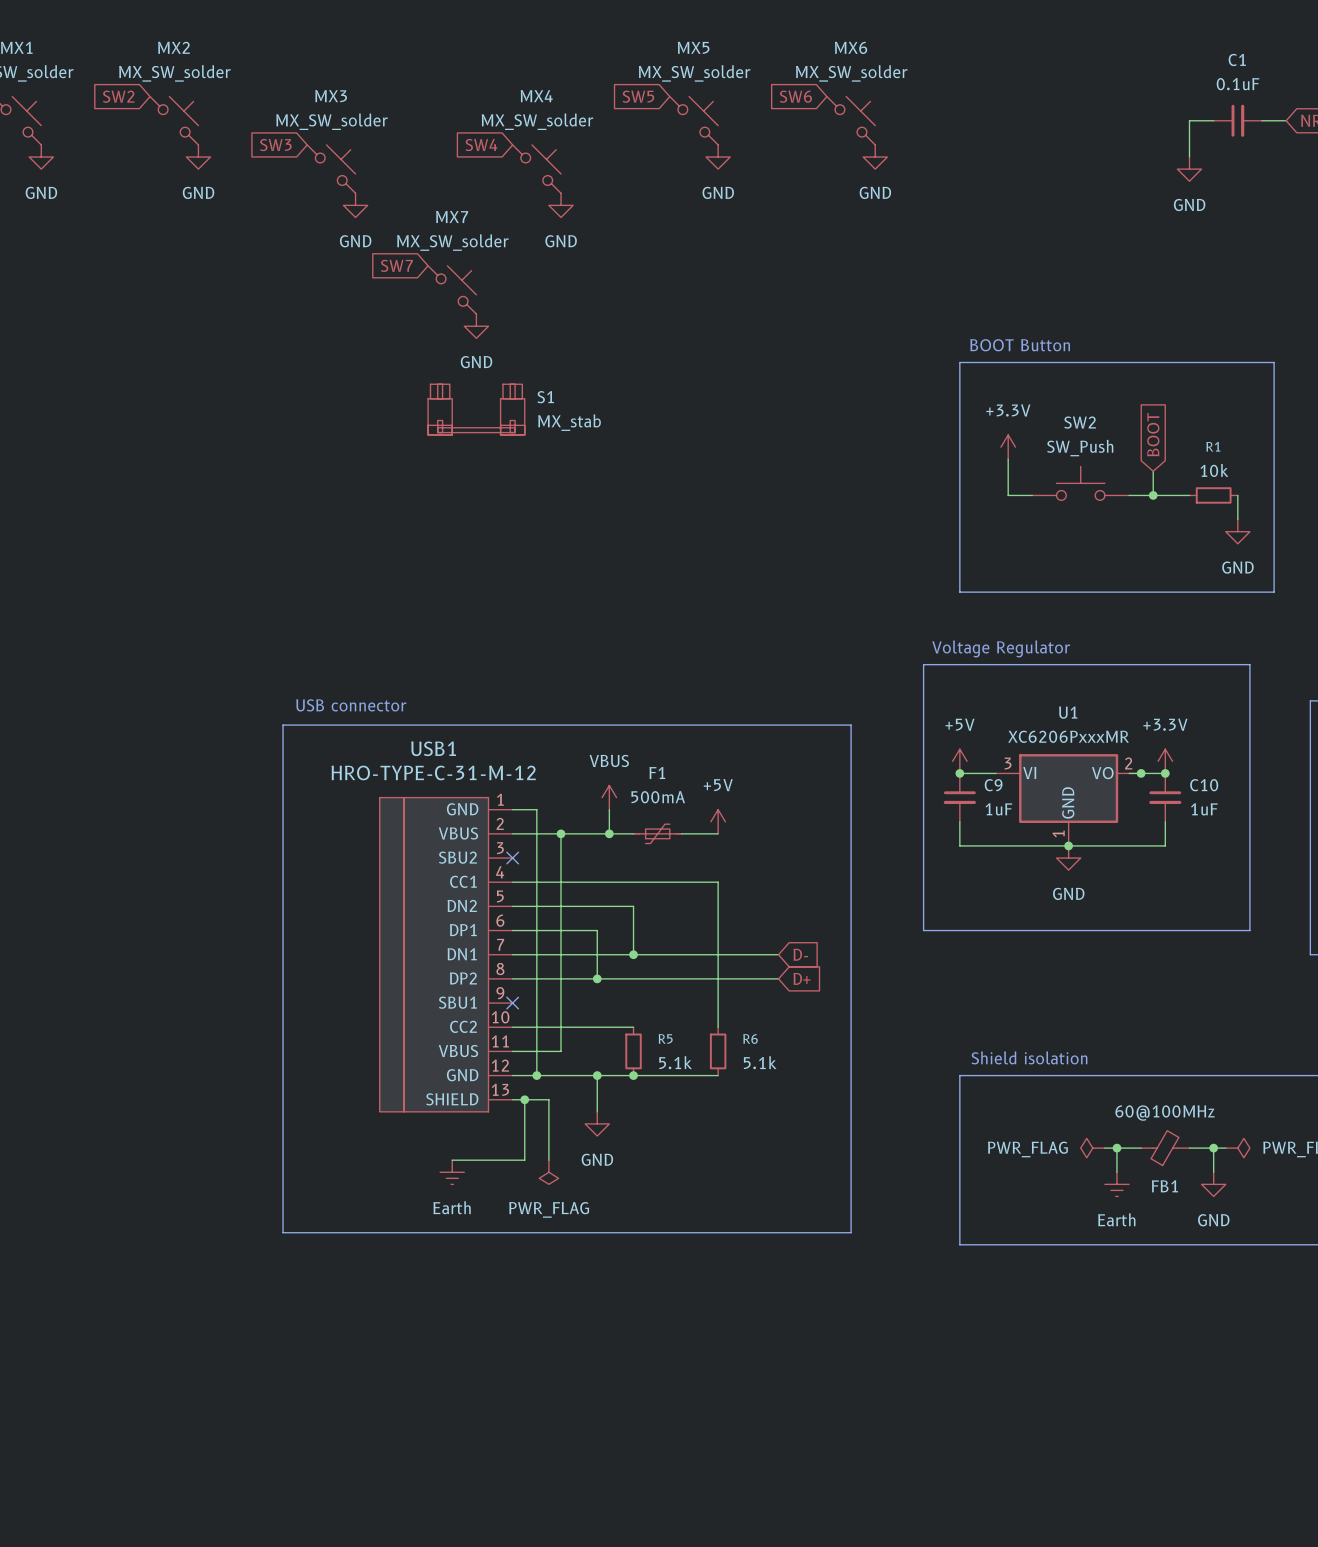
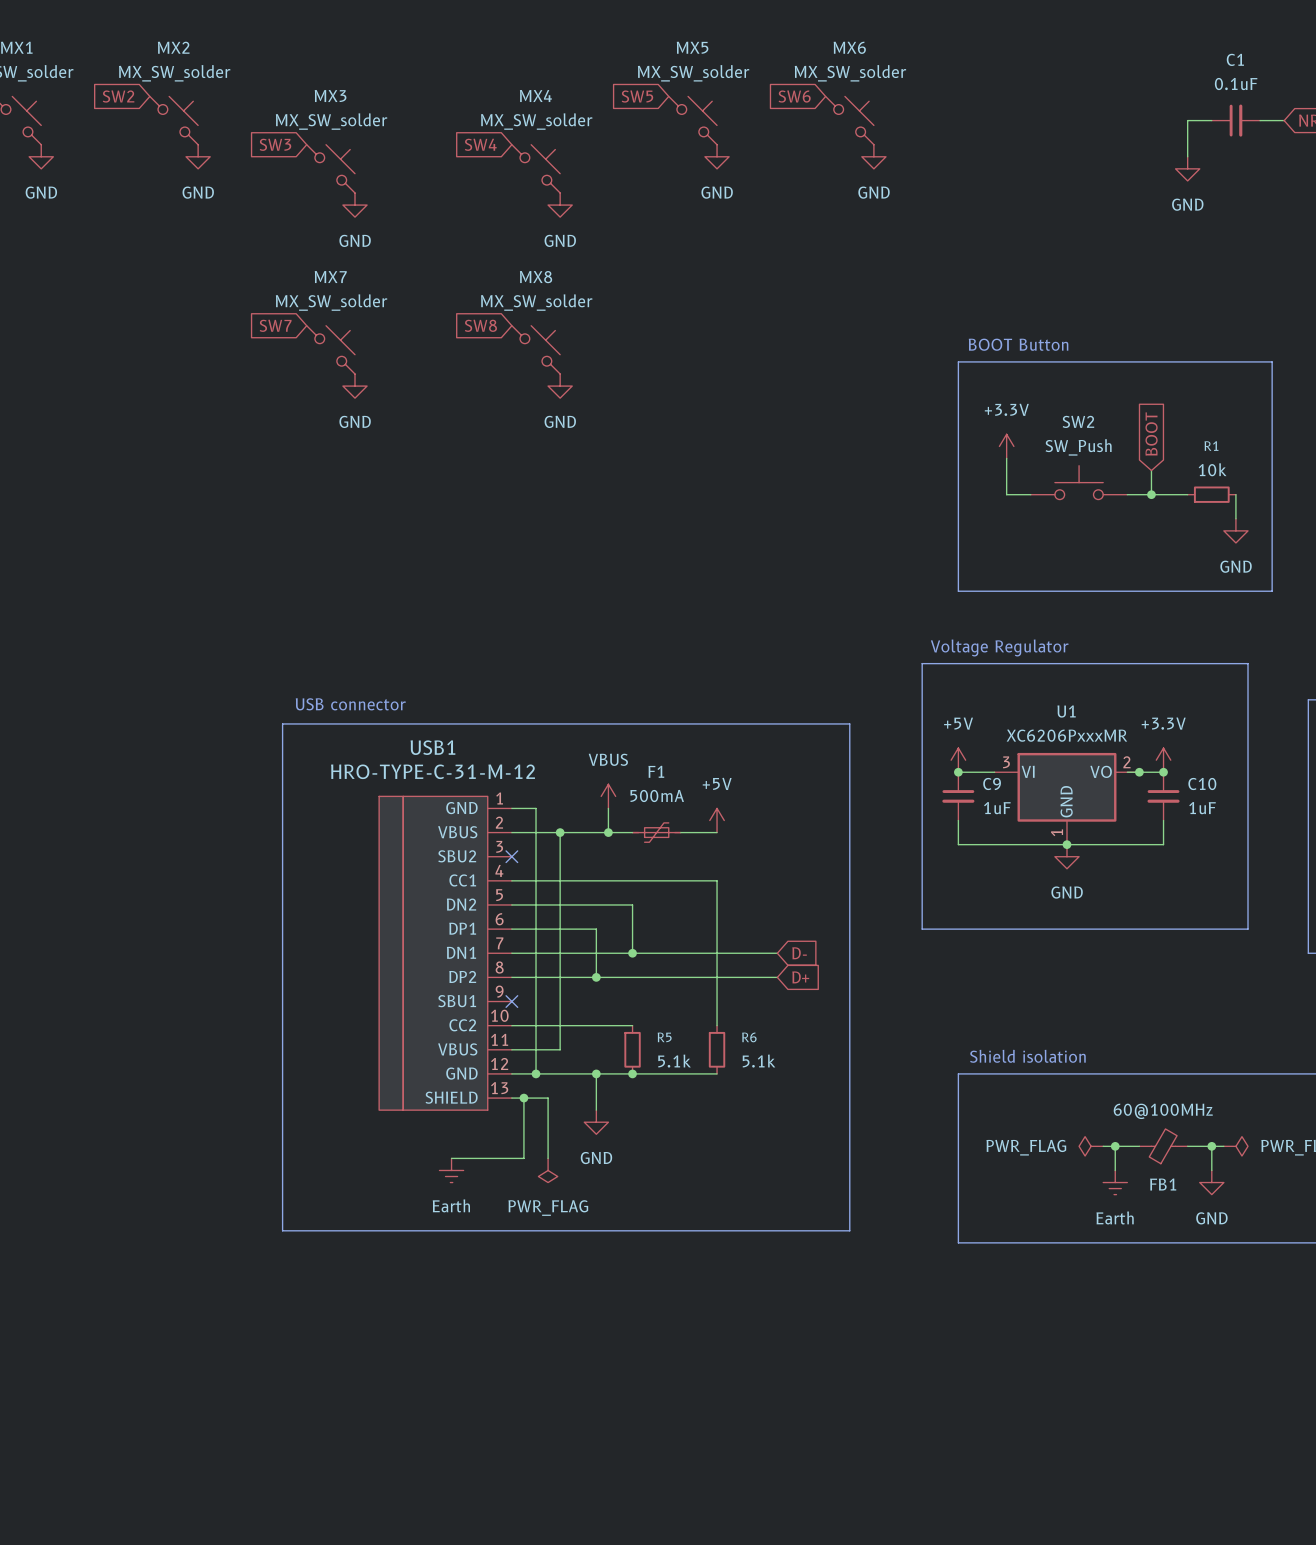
global label position: SW7 (396, 265) -> SW7 (275, 325)
MX7 position: (452, 289) -> (330, 349)
power symbol: GND (476, 326) -> none
global label: none -> SW8 (480, 325)
MX8: none -> MX_SW_solder (536, 349)
power symbol: none -> GND (355, 386)
power symbol: none -> GND (560, 386)
S1: MX_stab (476, 409) -> none

